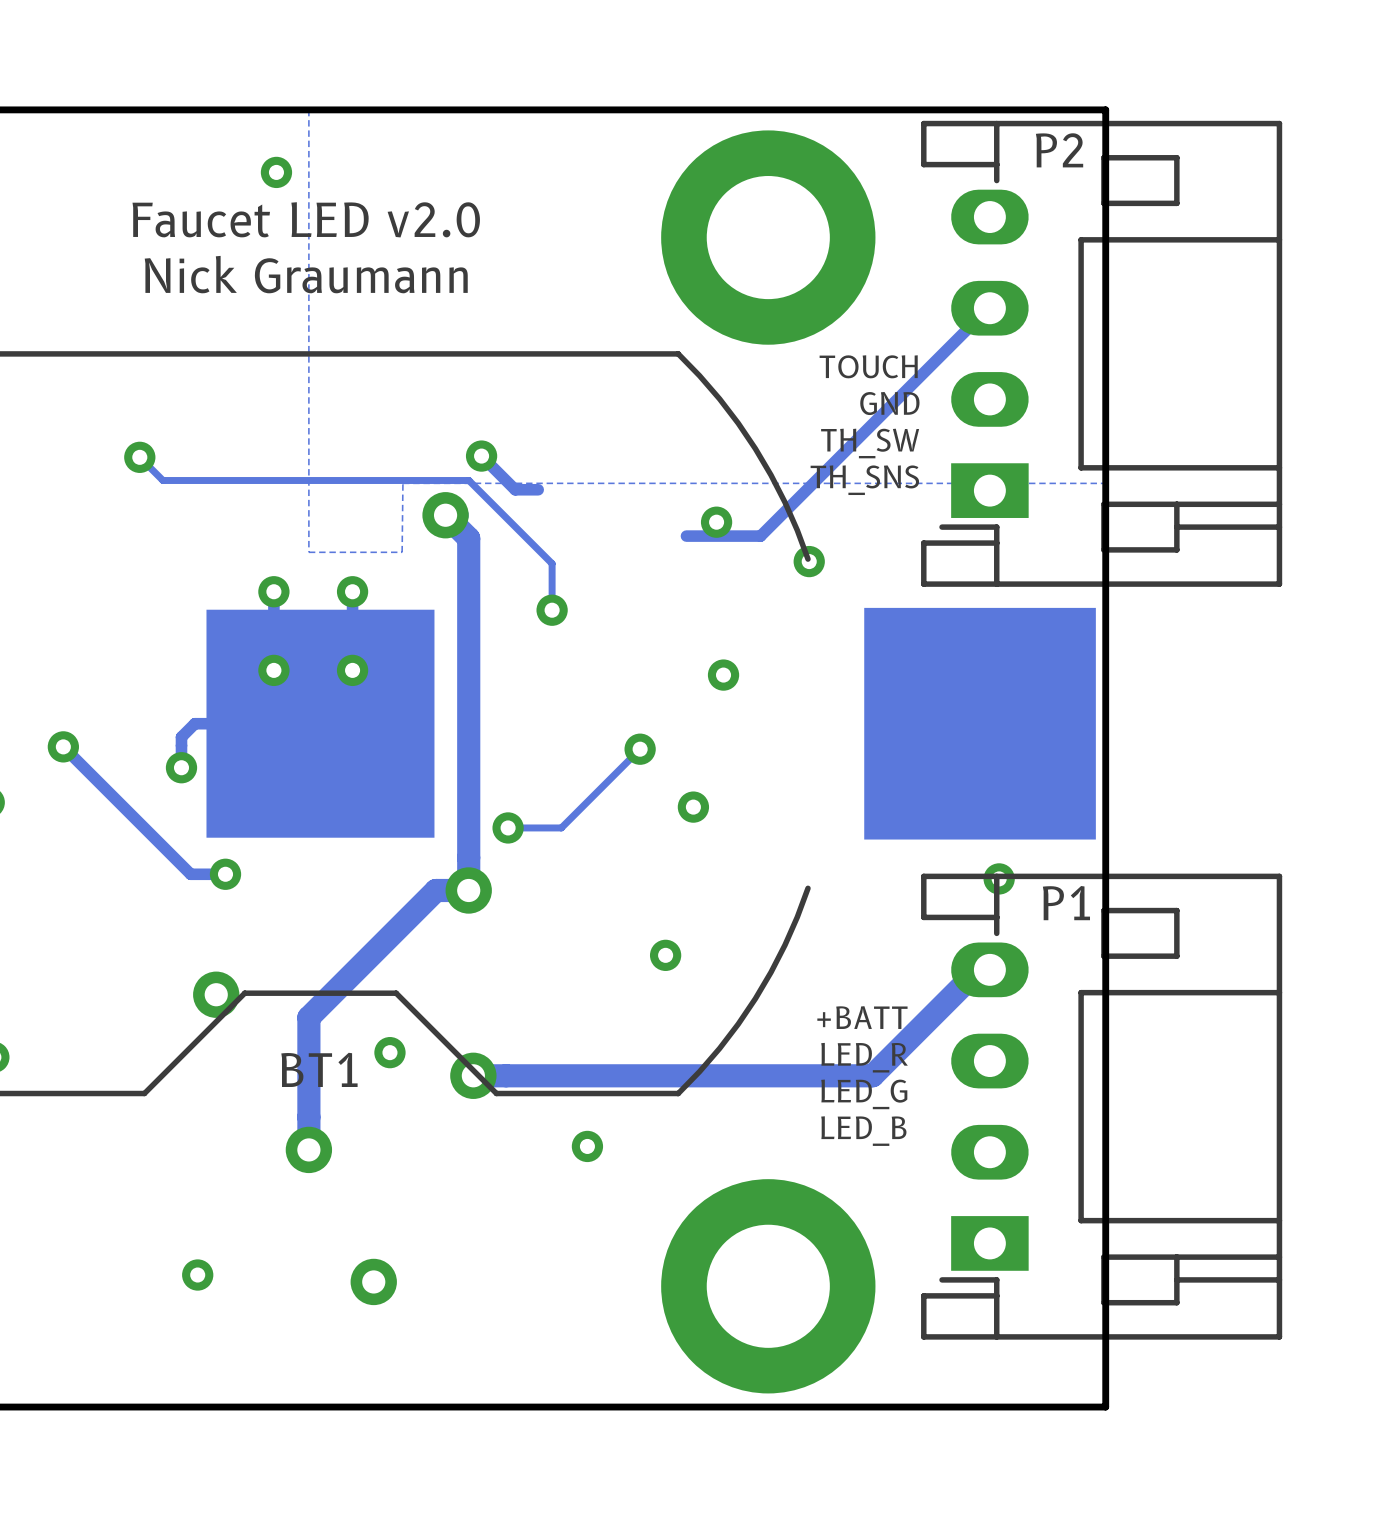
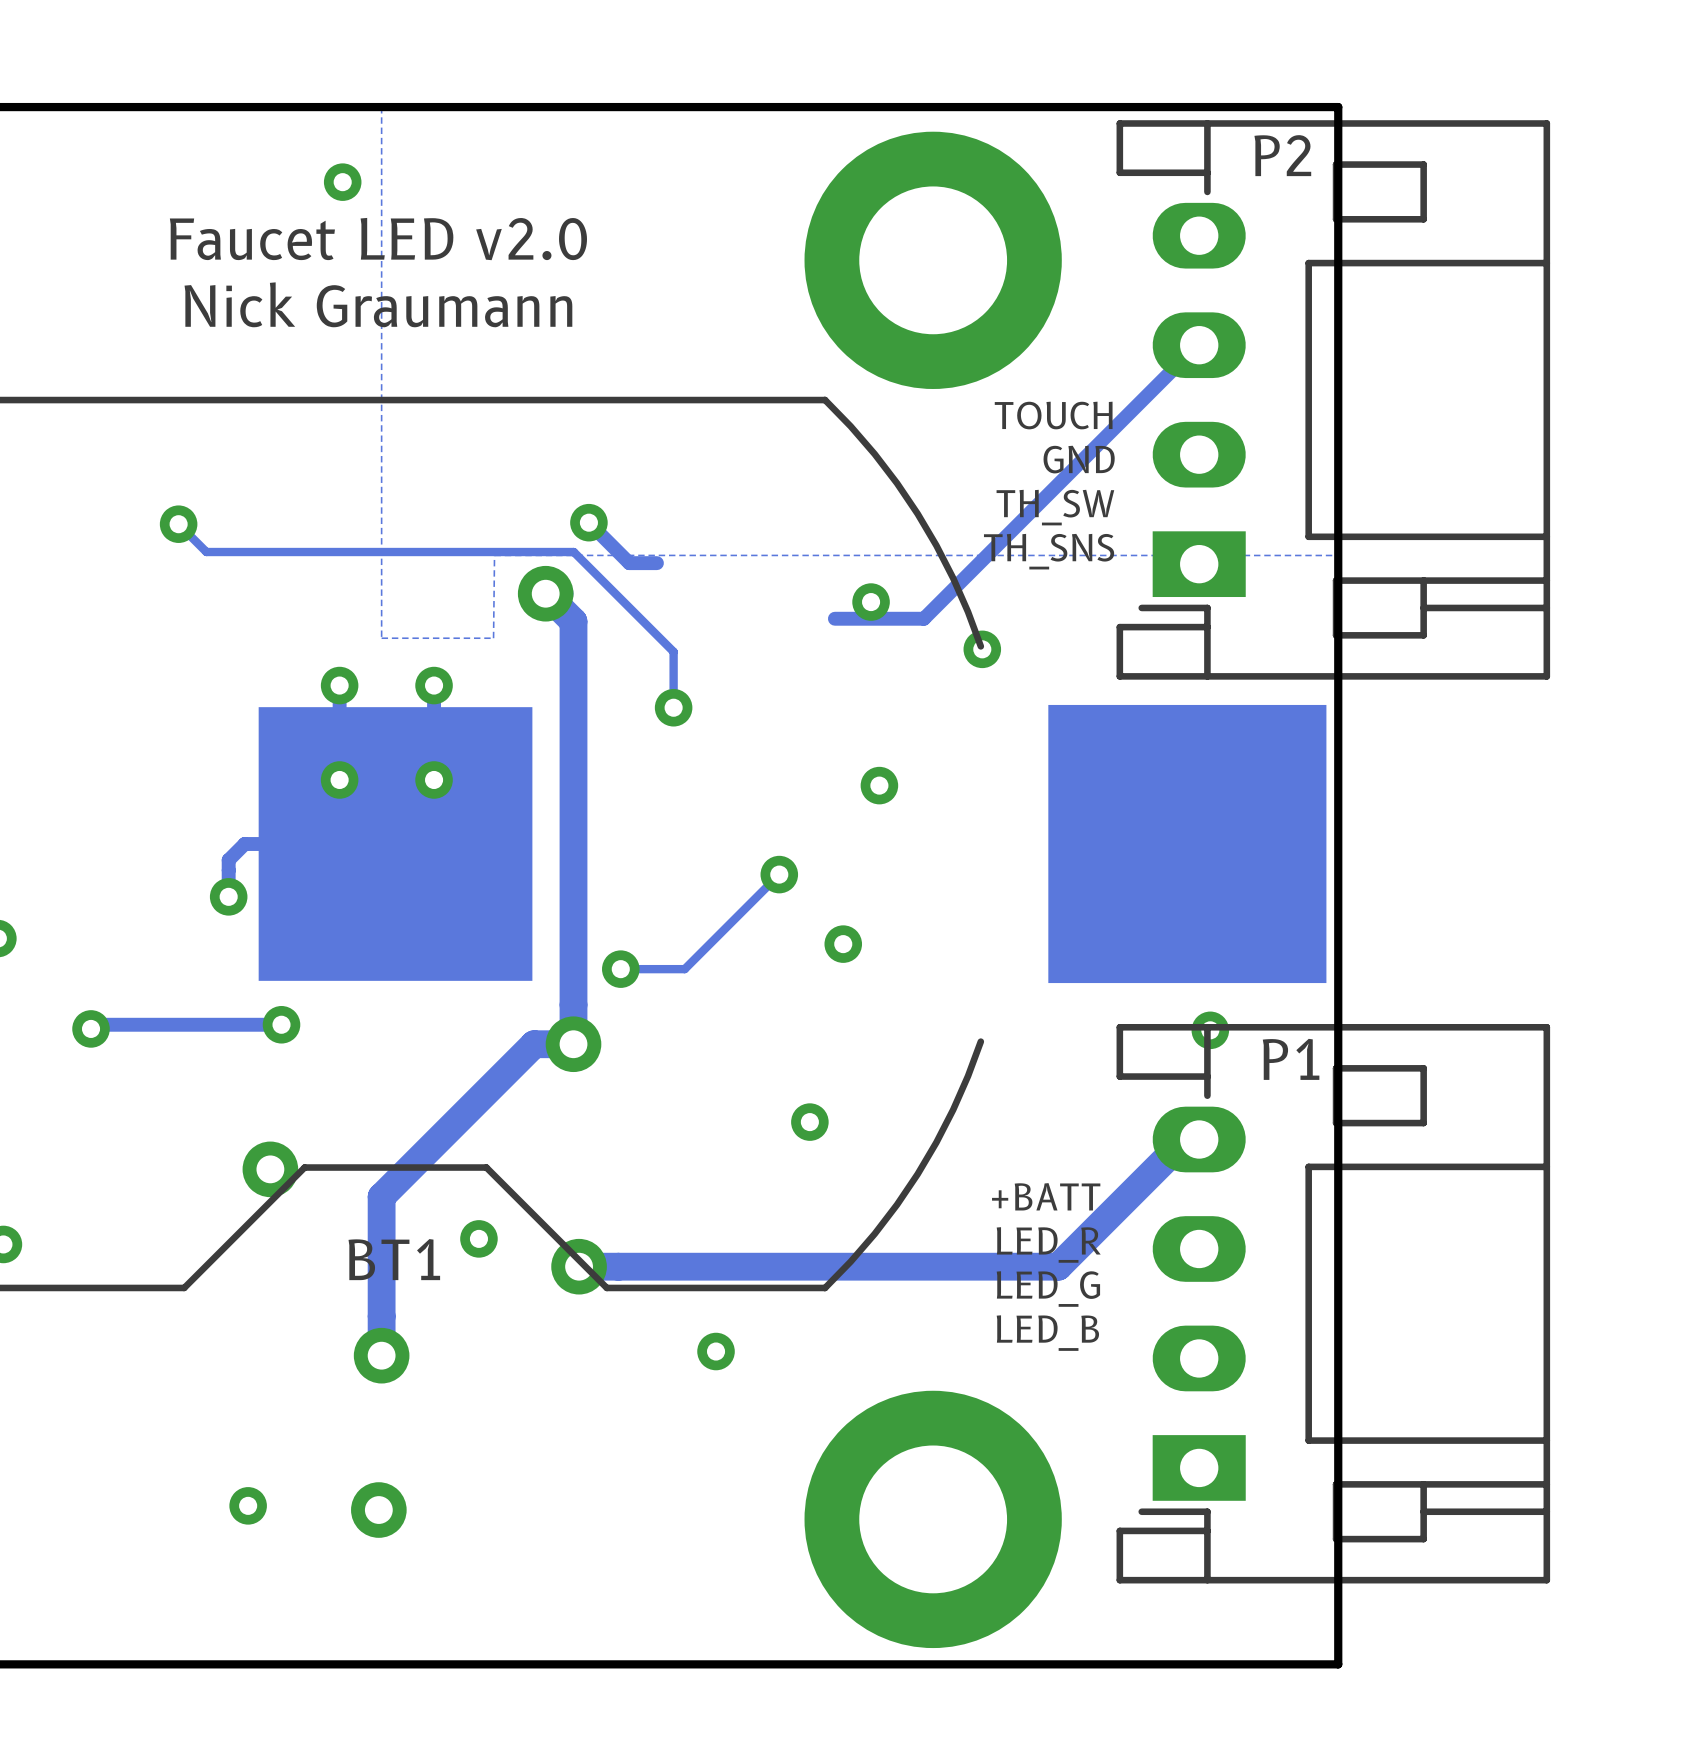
track: (63, 746) (190, 874) -> (91, 1028) (95, 1024) (239, 1024)
via position: (63, 746) -> (91, 1028)
via position: (373, 1281) -> (378, 1510)

